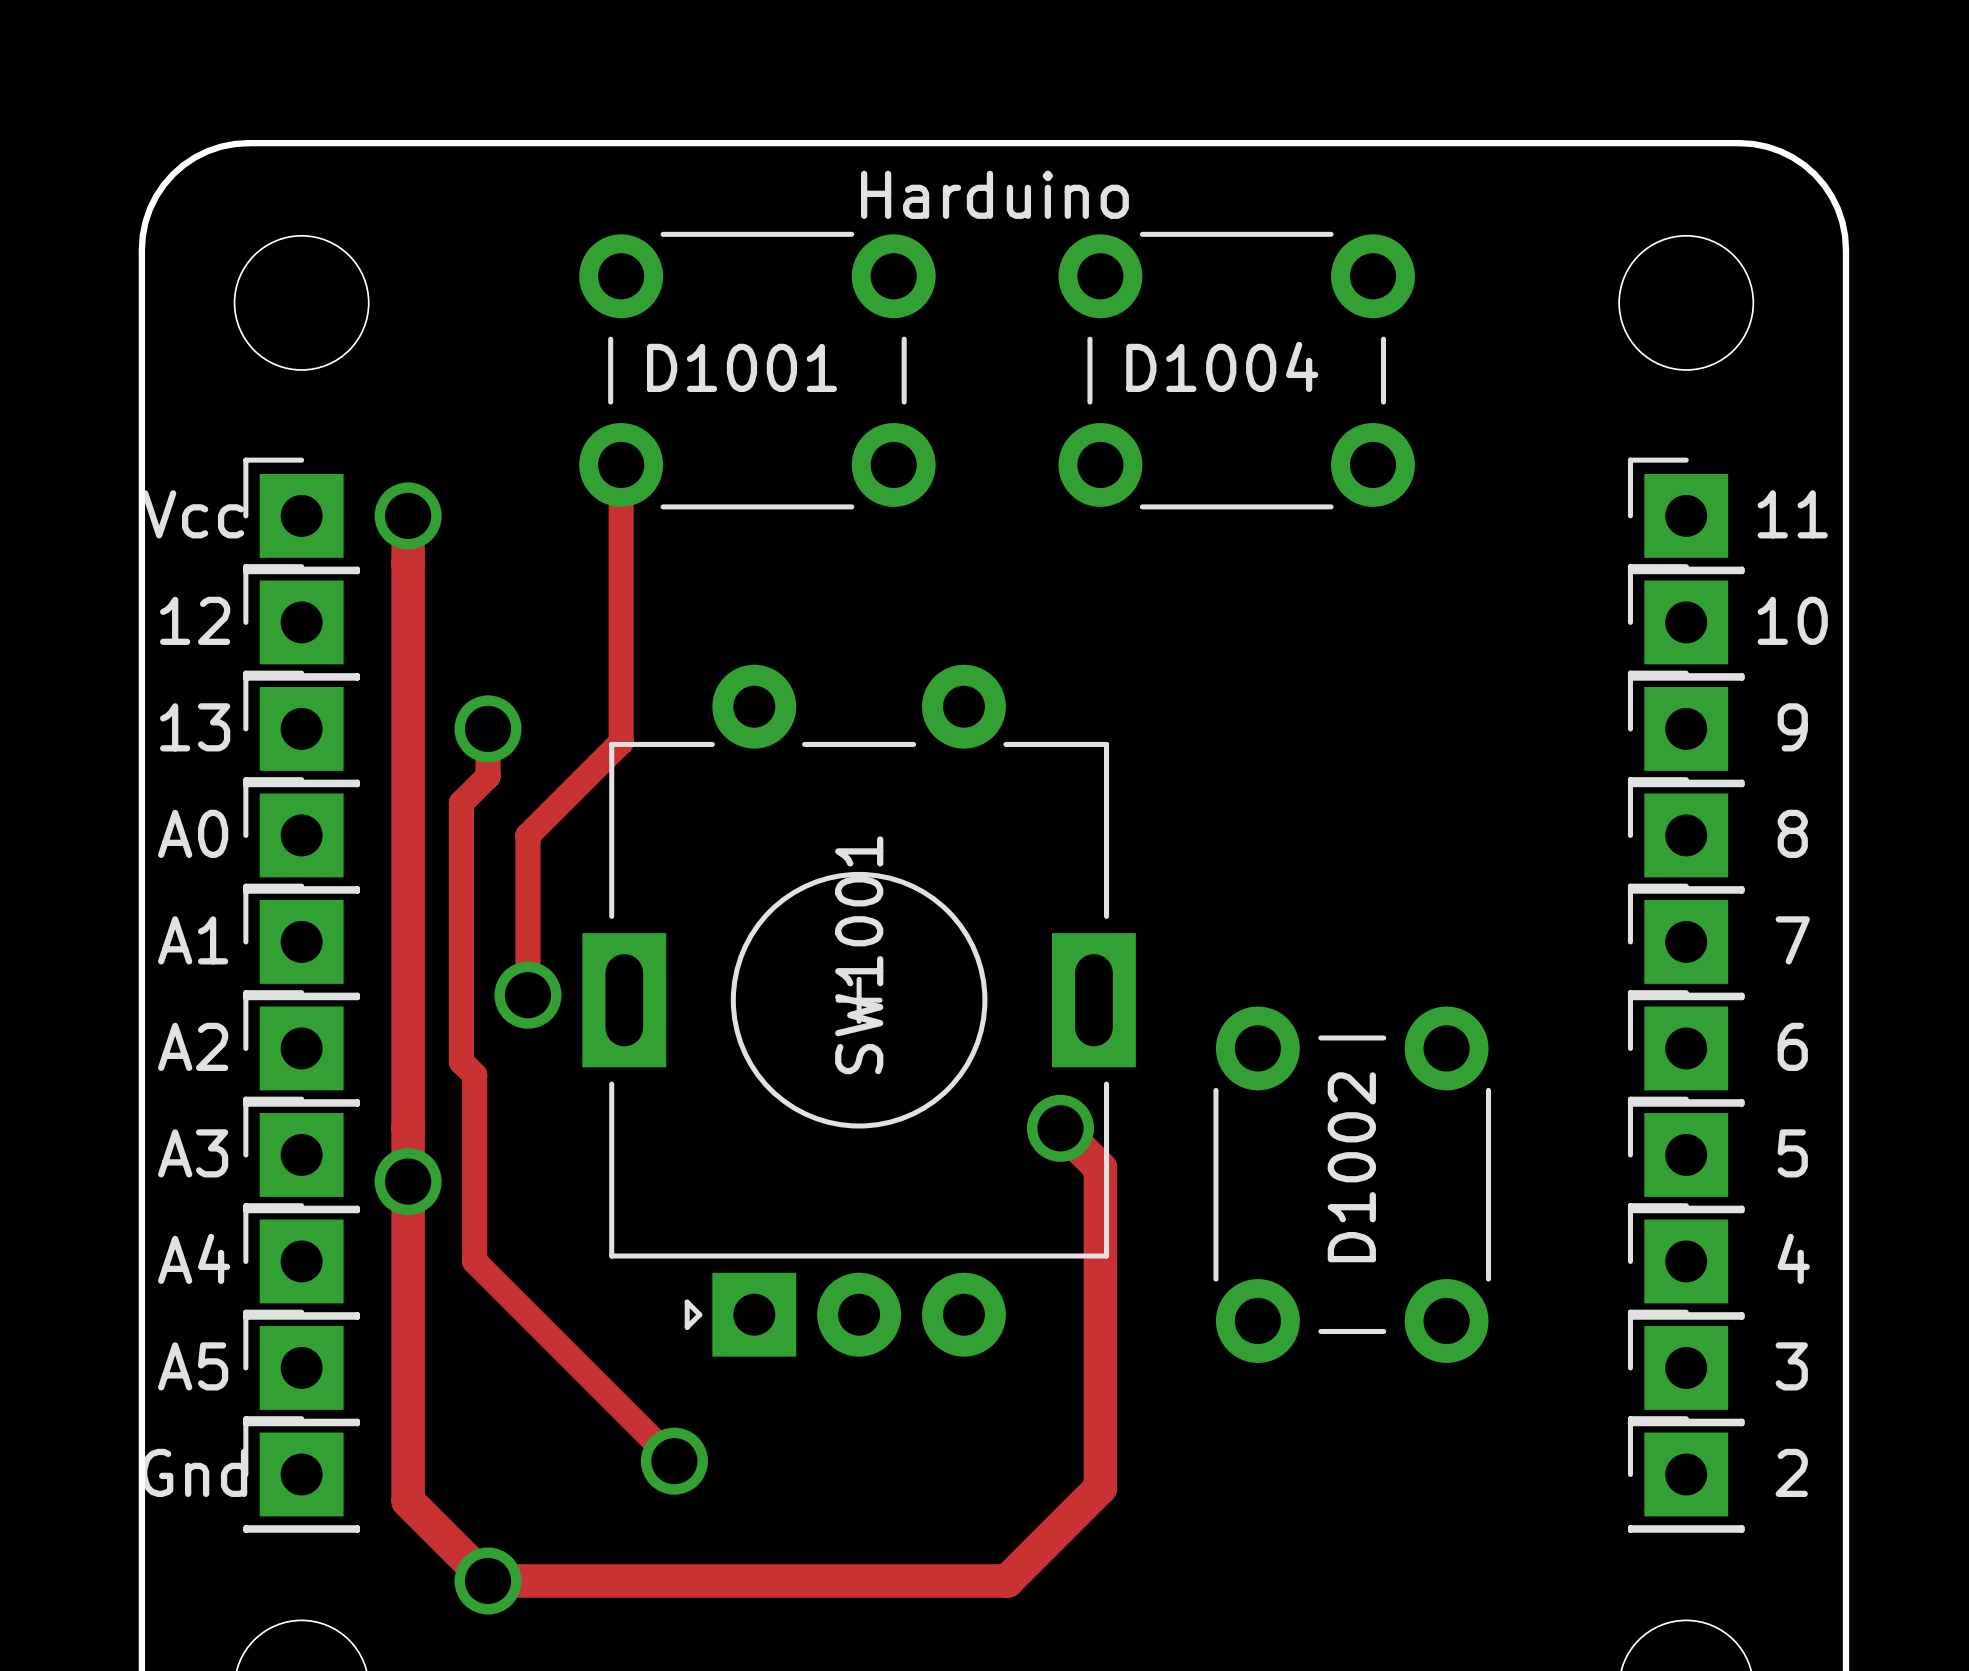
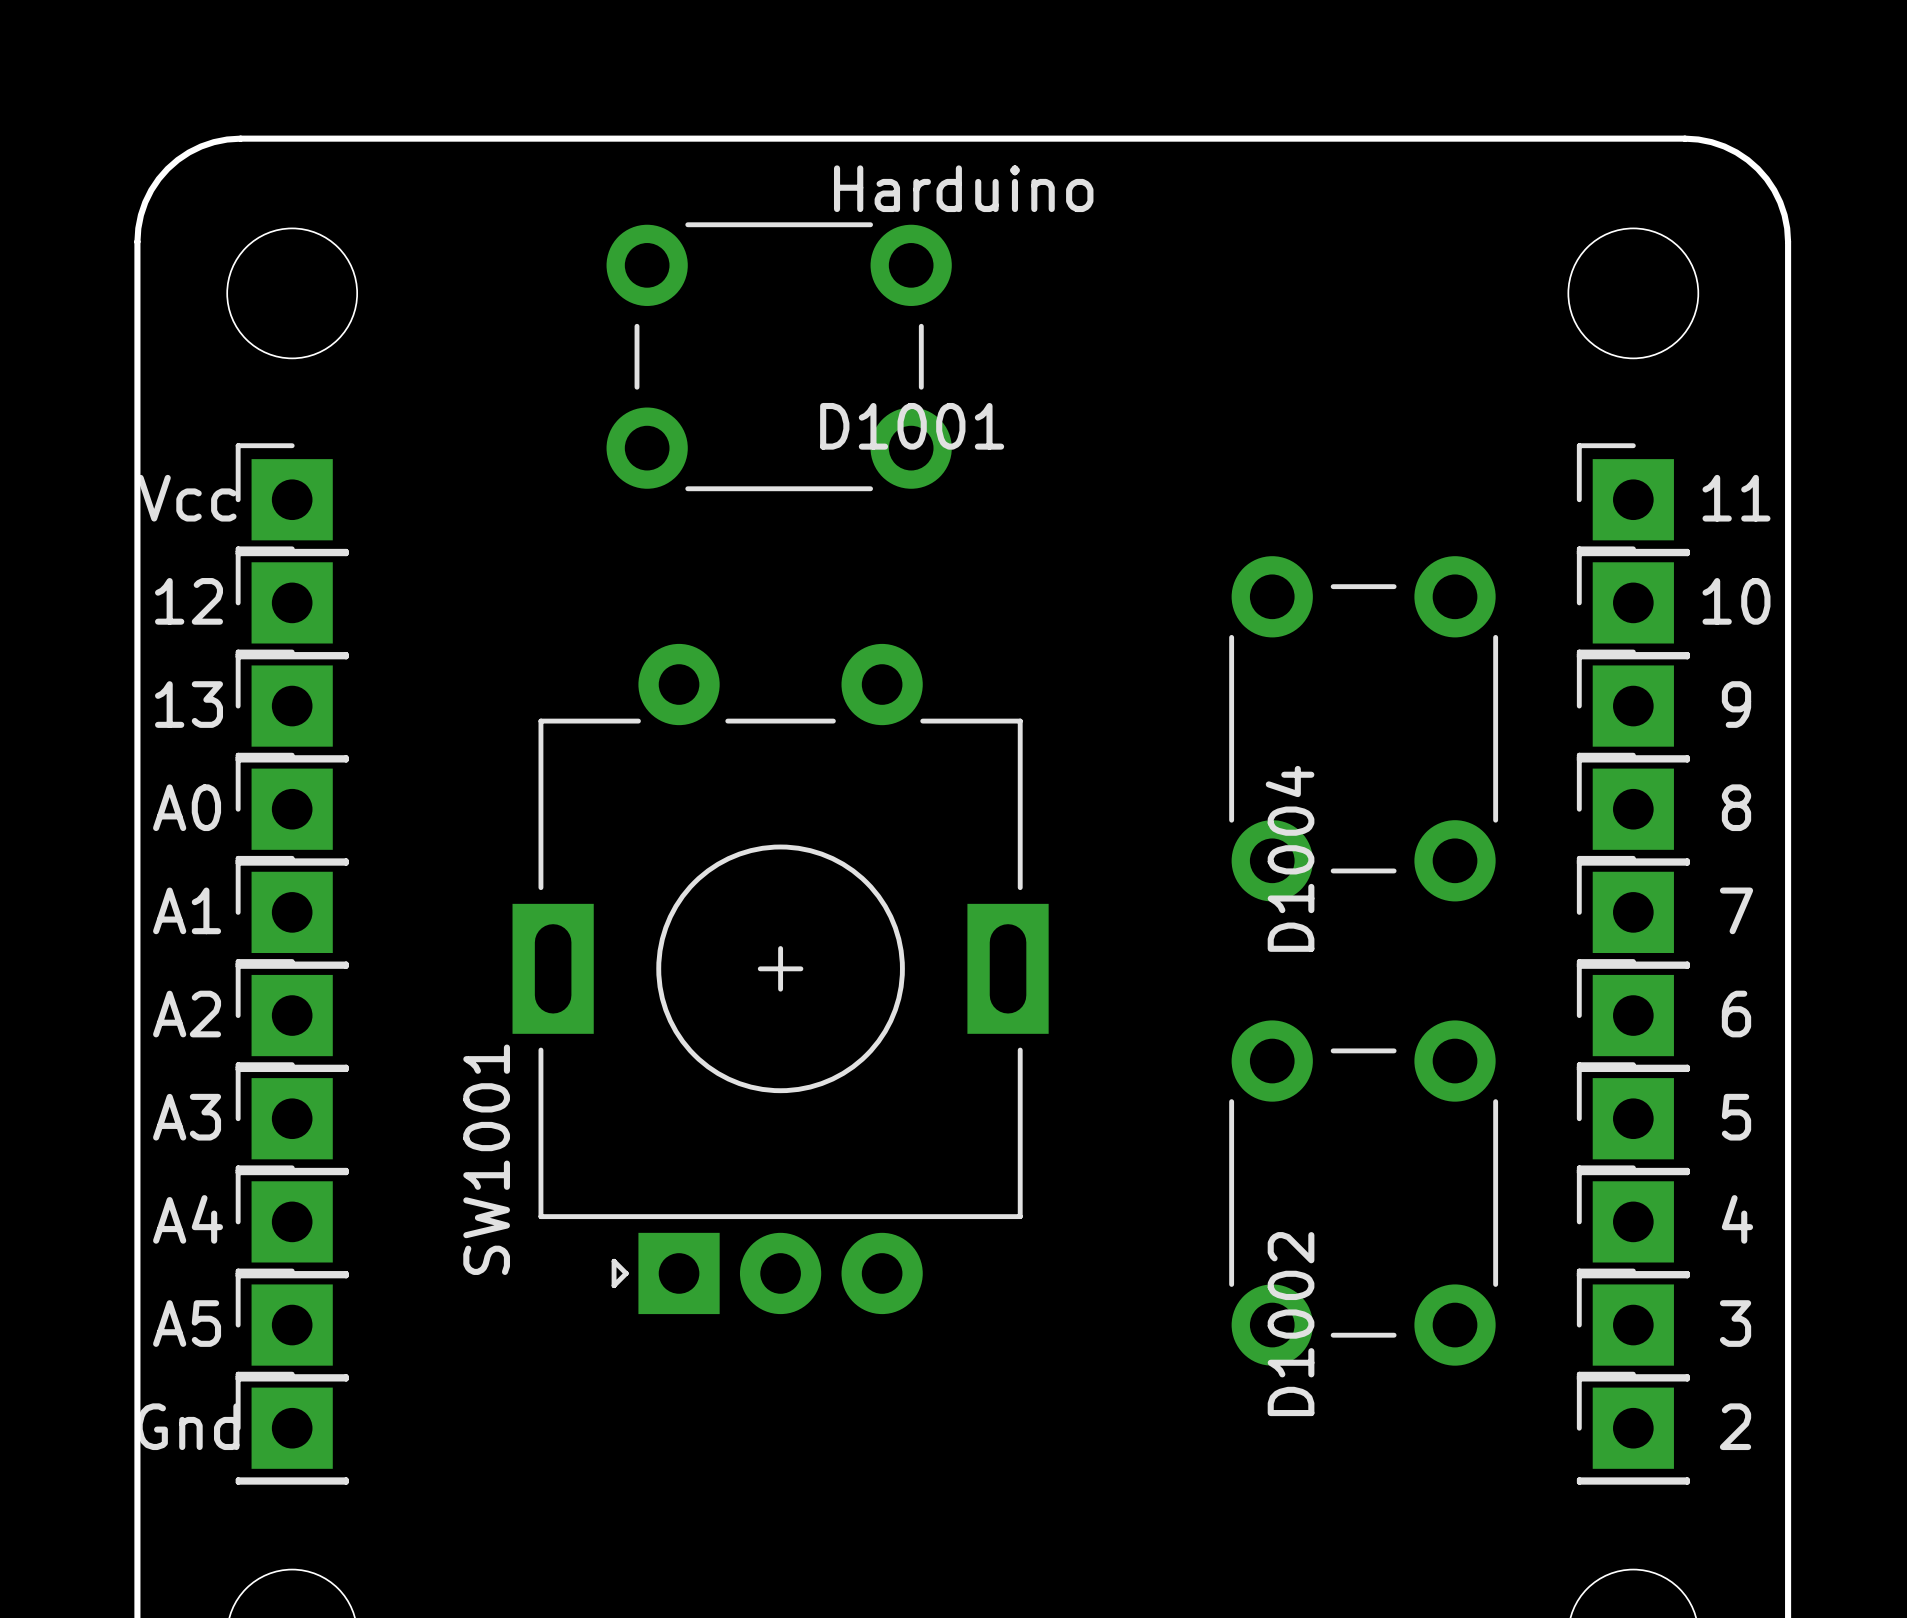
D1004 name position: D1004 (1222, 366) -> D1004 (1290, 858)
D1001 name position: D1001 (741, 367) -> D1001 (912, 426)
D1001 position: (757, 370) -> (779, 356)
D1004 rotation: 0° (1236, 370) -> 90° clockwise (1363, 728)
D1004 position: (1236, 370) -> (1363, 728)
track: (621, 464) (621, 742) (527, 835) (527, 995) -> none
track: (408, 515) (408, 1501) (488, 1580) (1007, 1580) (1100, 1487) (1100, 1168) (1060, 1128) -> none
via: (408, 515) -> none
track: (488, 728) (488, 776) (461, 802) (461, 1061) (474, 1075) (474, 1261) (674, 1461) -> none
via: (488, 728) -> none
SW1001 name position: SW1001 (859, 955) -> SW1001 (486, 1159)
via: (527, 995) -> none
SW1001 position: (859, 1010) -> (780, 978)
via: (1060, 1128) -> none
D1002 name position: D1002 (1351, 1167) -> D1002 (1291, 1324)
via: (408, 1181) -> none
D1002 position: (1352, 1184) -> (1363, 1193)
via: (674, 1461) -> none
via: (488, 1580) -> none

